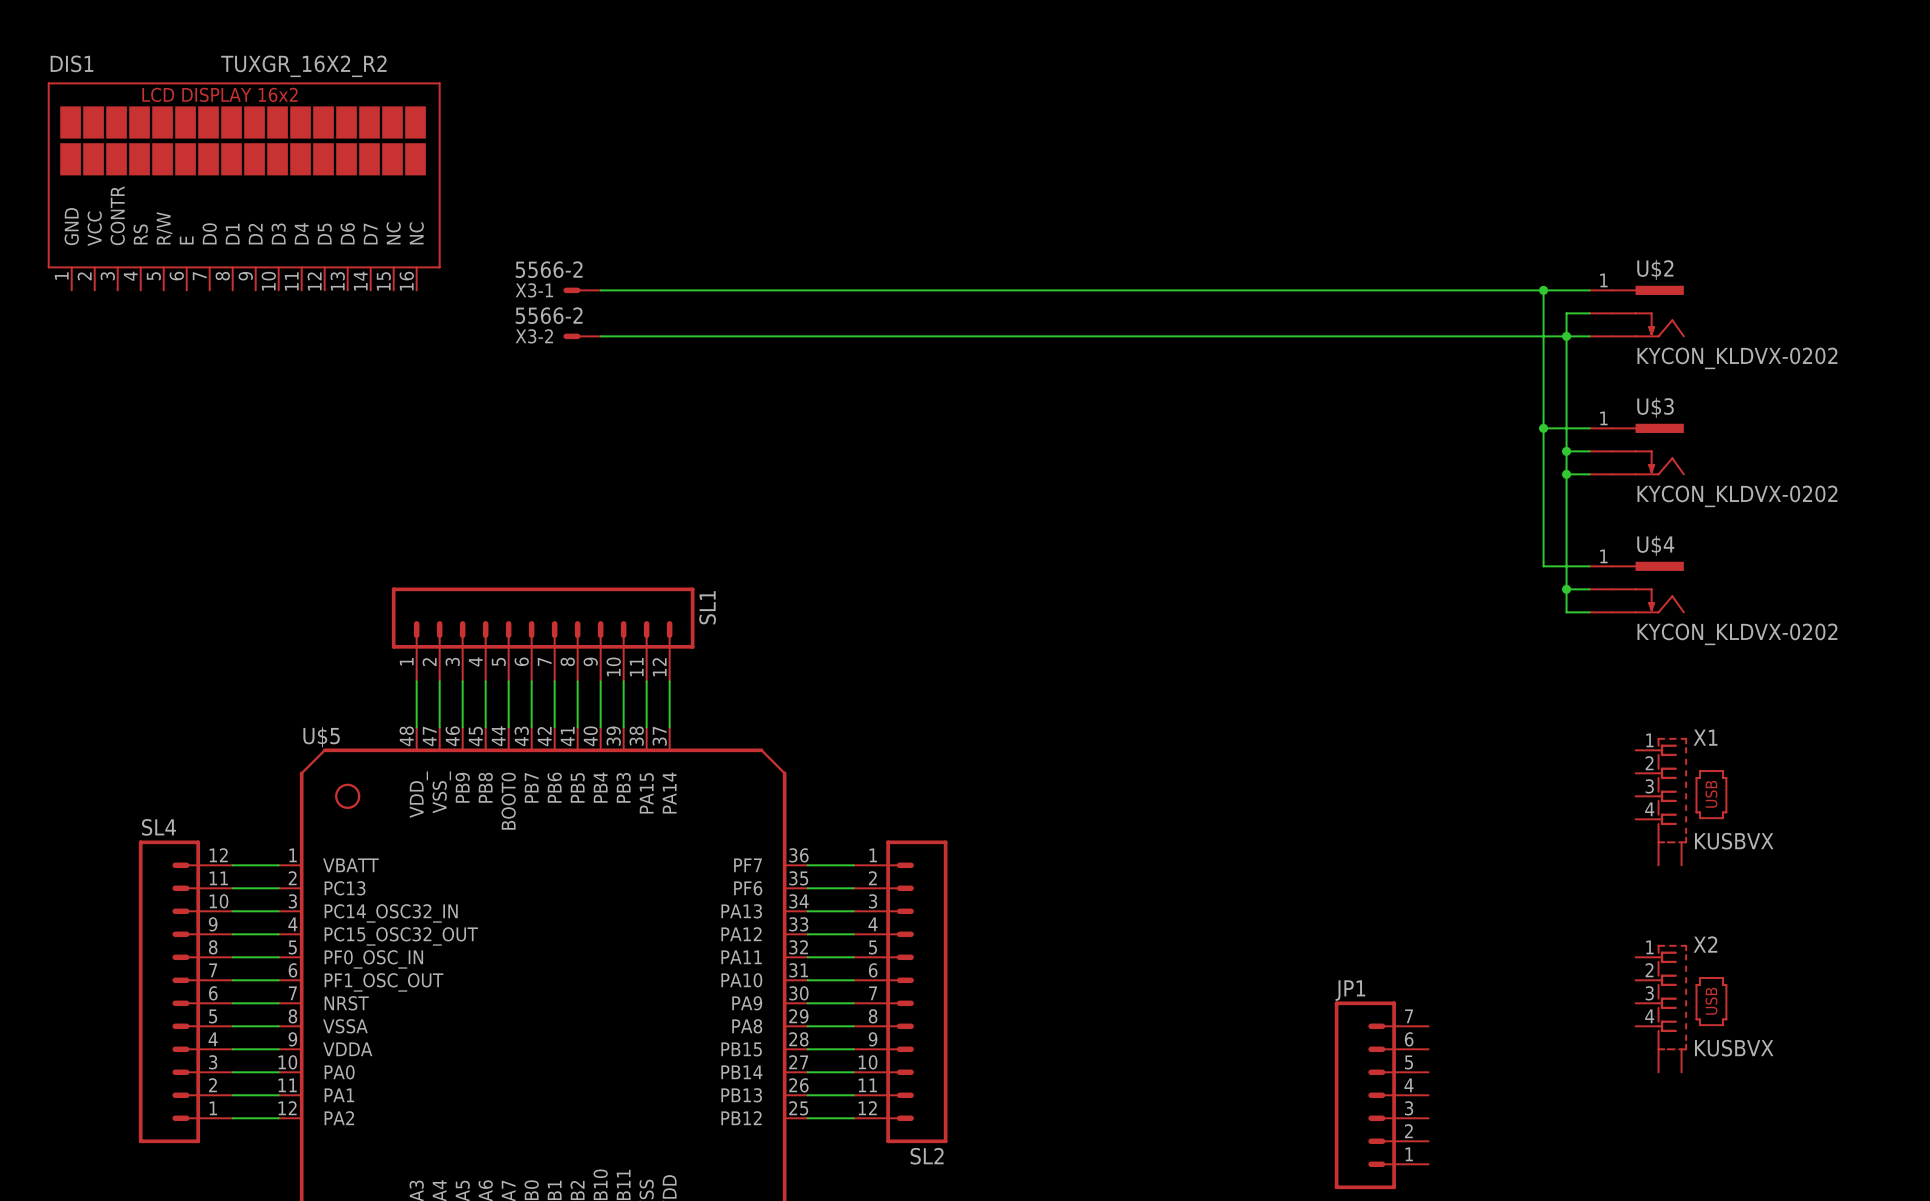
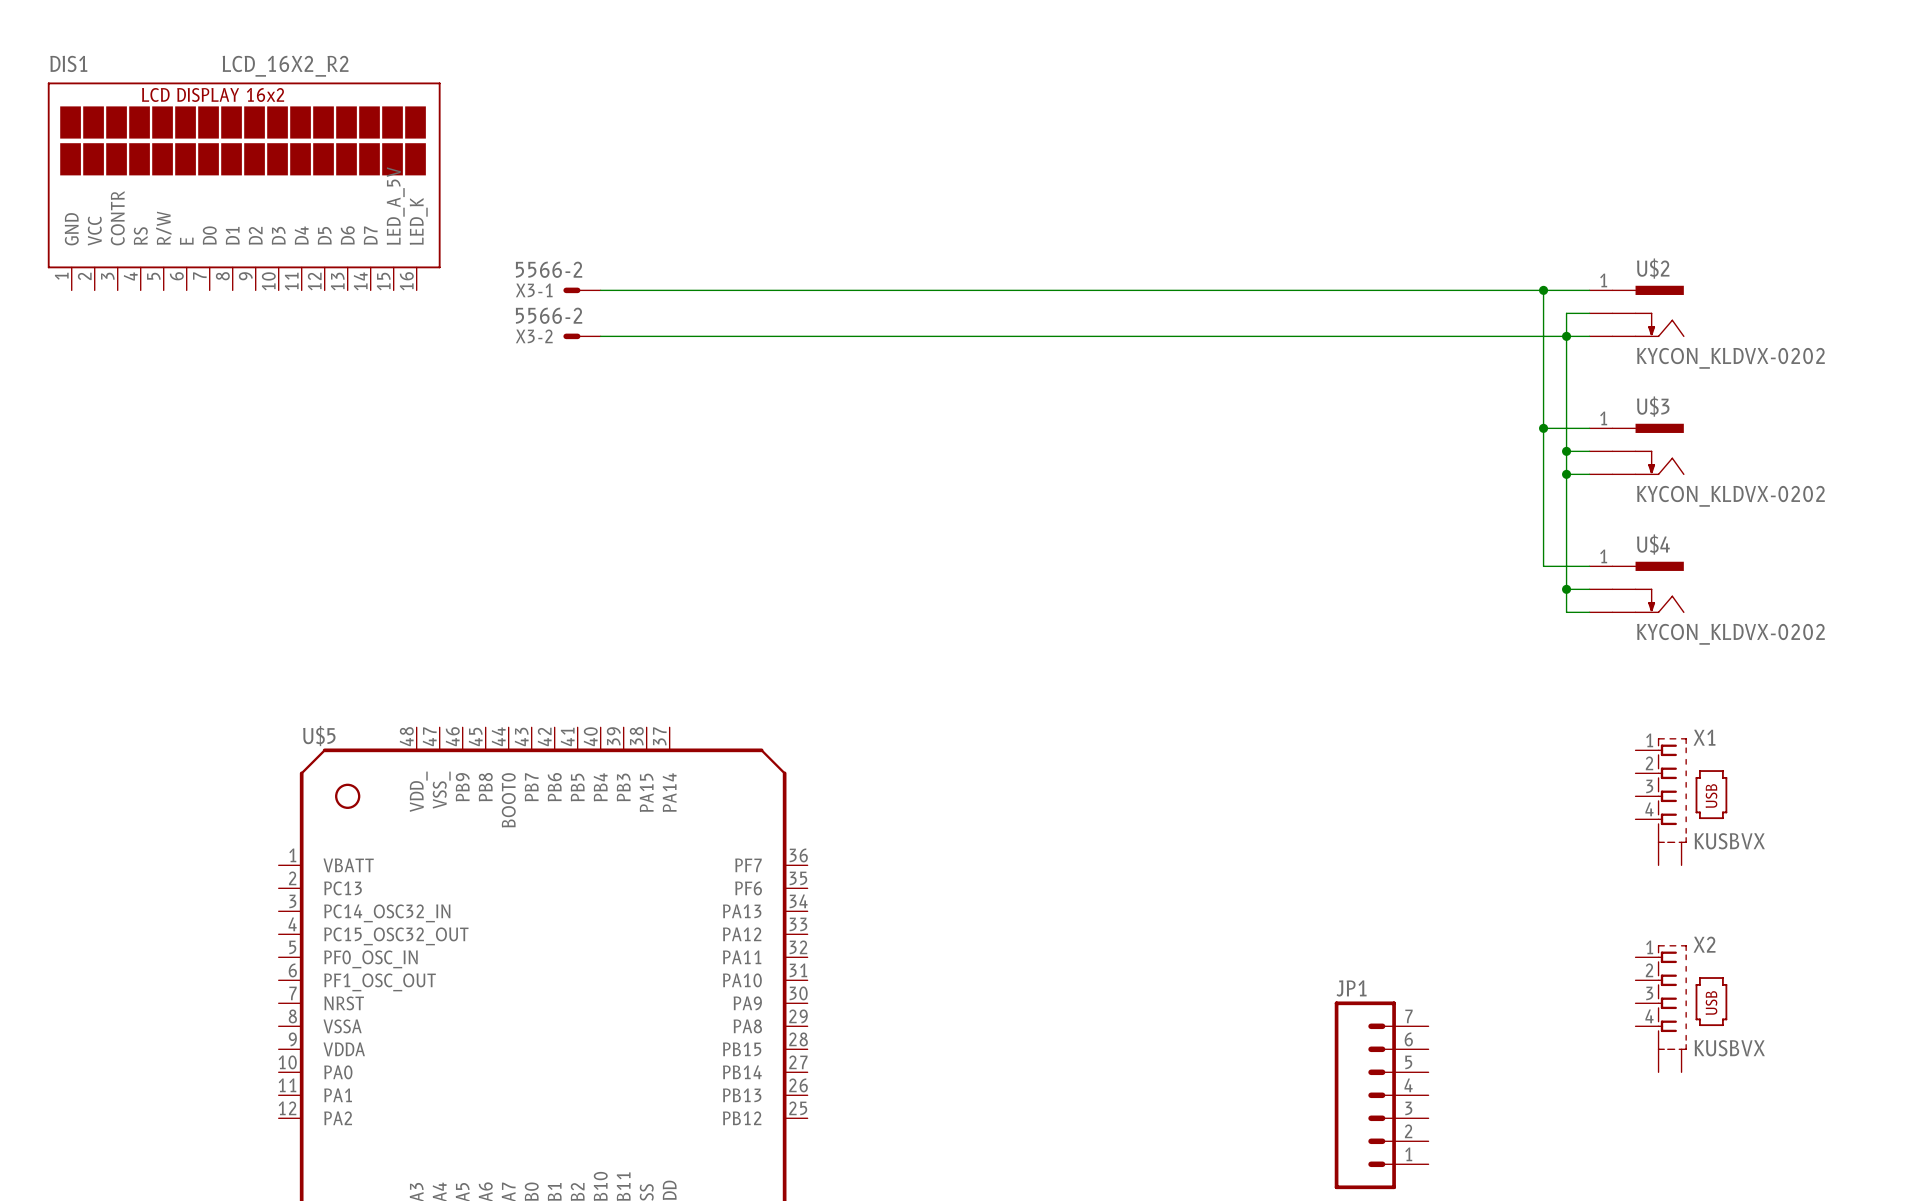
DIS1 value: TUXGR_16X2_R2 (303, 66) -> LCD_16X2_R2 (285, 66)
DIS1 pin name: NC (393, 233) -> LED_A_5V (395, 206)
DIS1 pin name: NC (416, 233) -> LED_K (418, 221)
SL1: (543, 634) -> none
wire: (416, 681) (416, 727) -> none
wire: (439, 681) (439, 727) -> none
wire: (462, 681) (462, 727) -> none
wire: (485, 681) (485, 727) -> none
wire: (508, 681) (508, 727) -> none
wire: (531, 681) (531, 727) -> none
wire: (554, 681) (554, 727) -> none
wire: (577, 681) (577, 727) -> none
wire: (600, 681) (600, 727) -> none
wire: (623, 681) (623, 727) -> none
wire: (646, 681) (646, 727) -> none
wire: (669, 681) (669, 727) -> none
wire: (232, 865) (278, 865) -> none
wire: (807, 865) (853, 865) -> none
wire: (232, 888) (278, 888) -> none
wire: (807, 888) (853, 888) -> none
wire: (232, 911) (278, 911) -> none
wire: (807, 911) (853, 911) -> none
wire: (232, 934) (278, 934) -> none
wire: (807, 934) (853, 934) -> none
wire: (232, 957) (278, 957) -> none
wire: (807, 957) (853, 957) -> none
wire: (232, 980) (278, 980) -> none
wire: (807, 980) (853, 980) -> none
SL4: (185, 991) -> none
SL2: (900, 991) -> none
wire: (232, 1003) (278, 1003) -> none
wire: (807, 1003) (853, 1003) -> none
wire: (232, 1026) (278, 1026) -> none
wire: (807, 1026) (853, 1026) -> none
wire: (232, 1049) (278, 1049) -> none
wire: (807, 1049) (853, 1049) -> none
wire: (232, 1072) (278, 1072) -> none
wire: (807, 1072) (853, 1072) -> none
wire: (232, 1095) (278, 1095) -> none
wire: (807, 1095) (853, 1095) -> none
wire: (232, 1118) (278, 1118) -> none
wire: (807, 1118) (853, 1118) -> none

